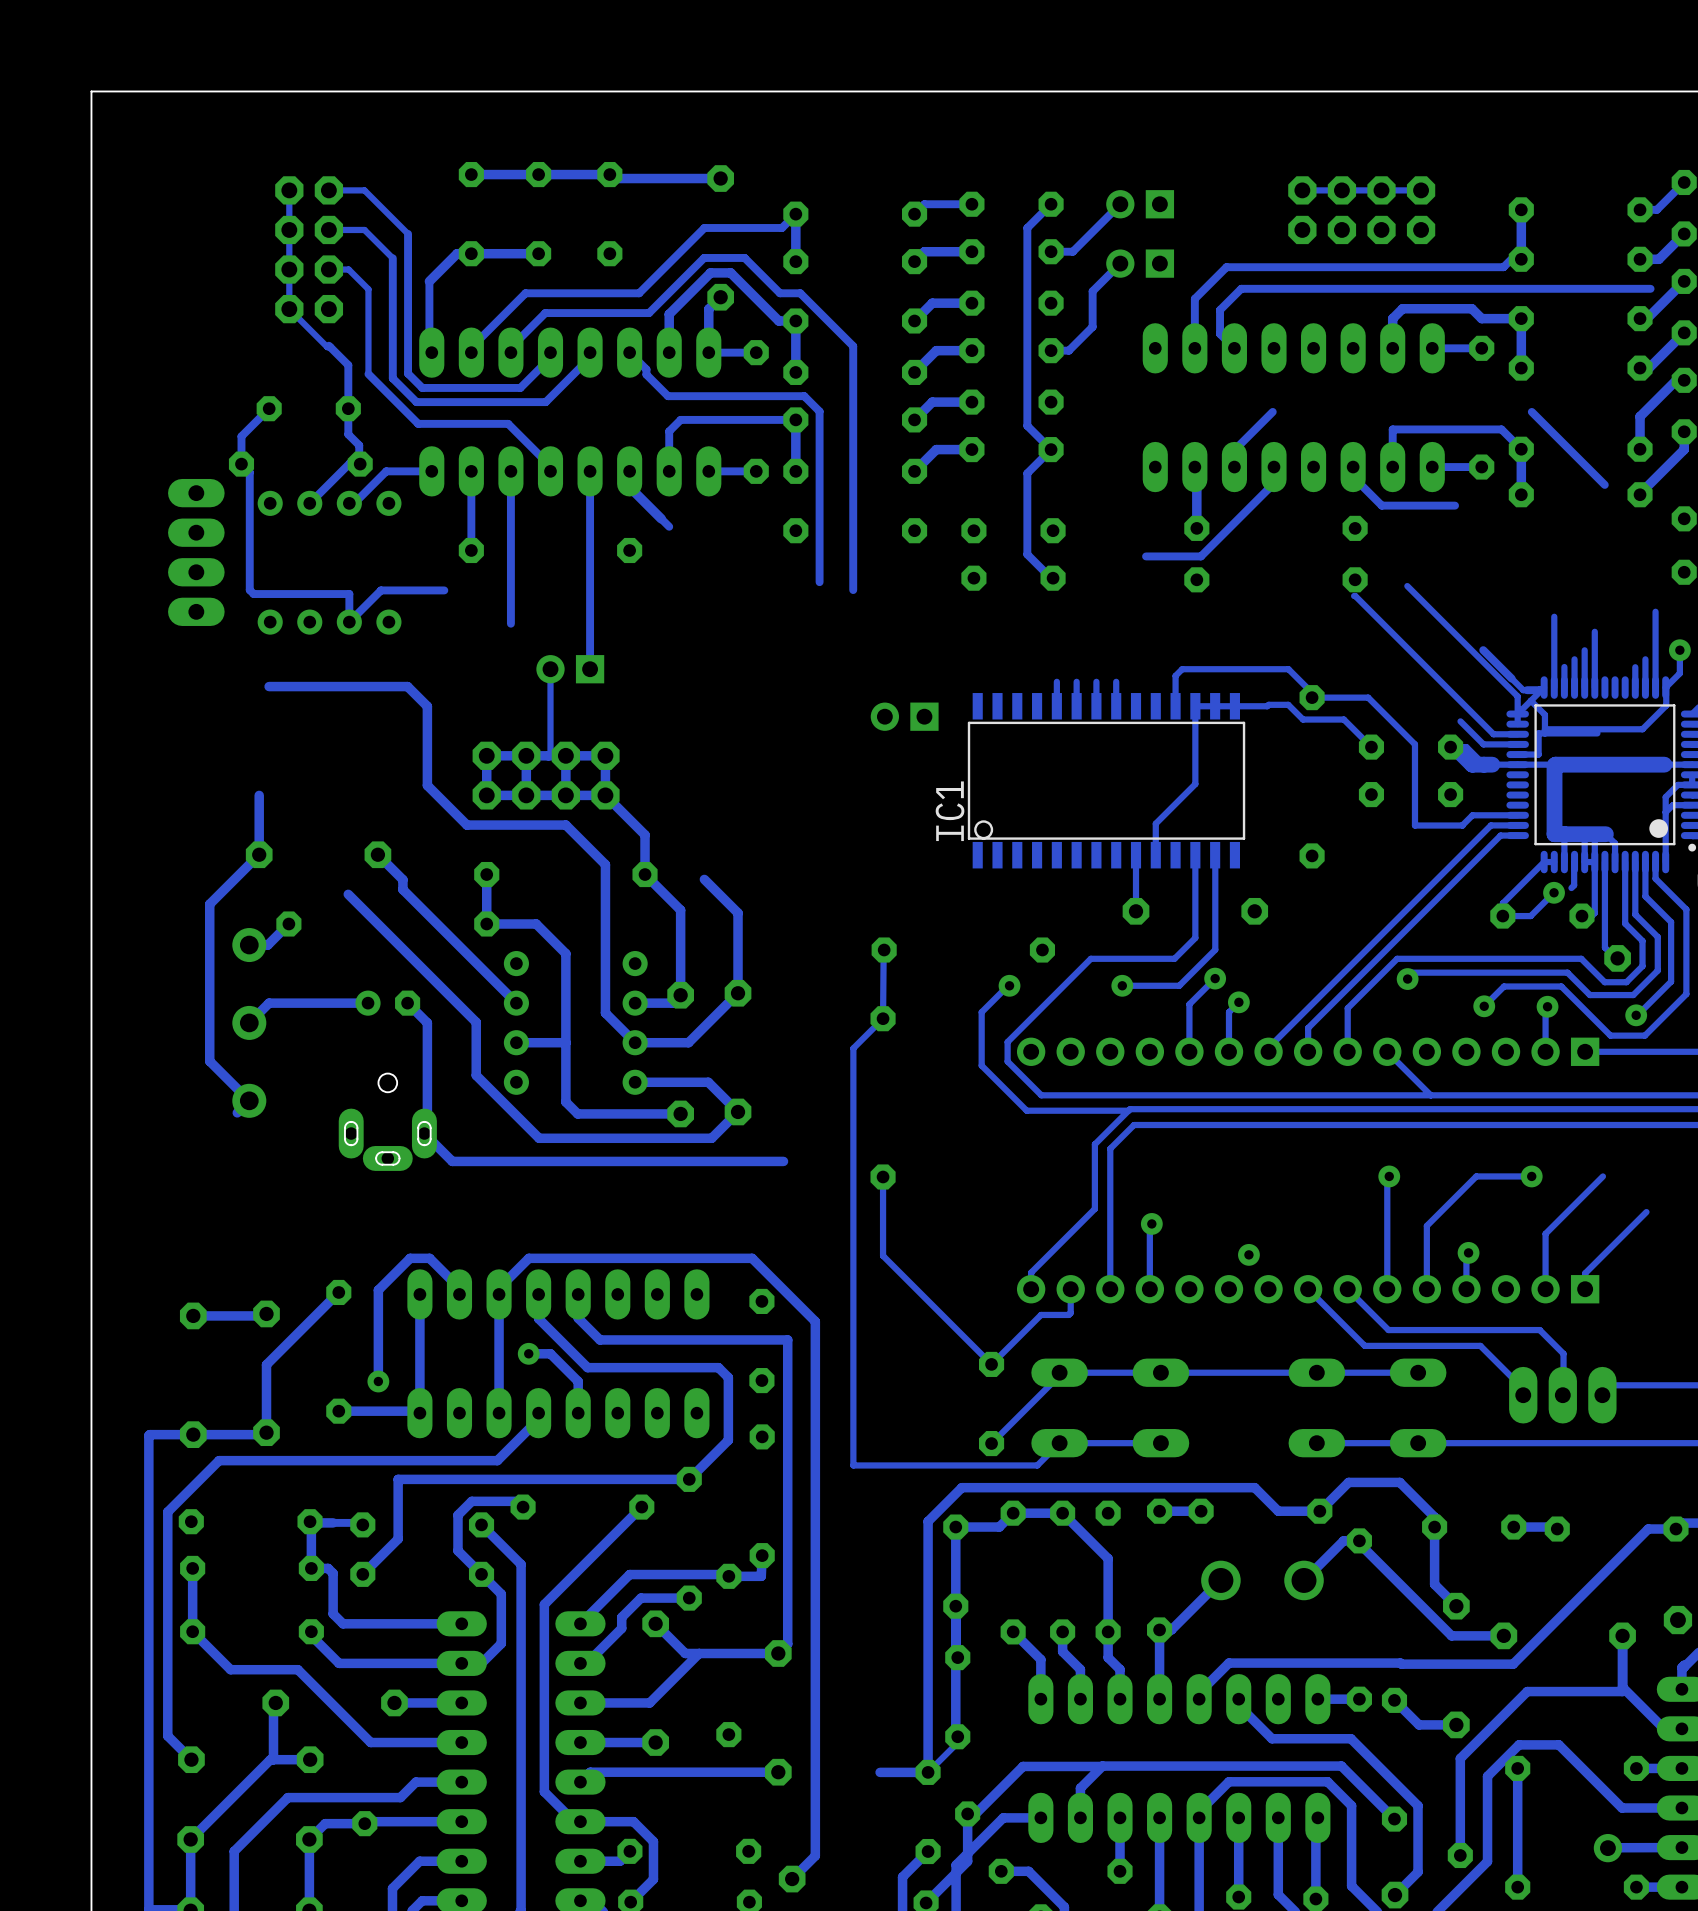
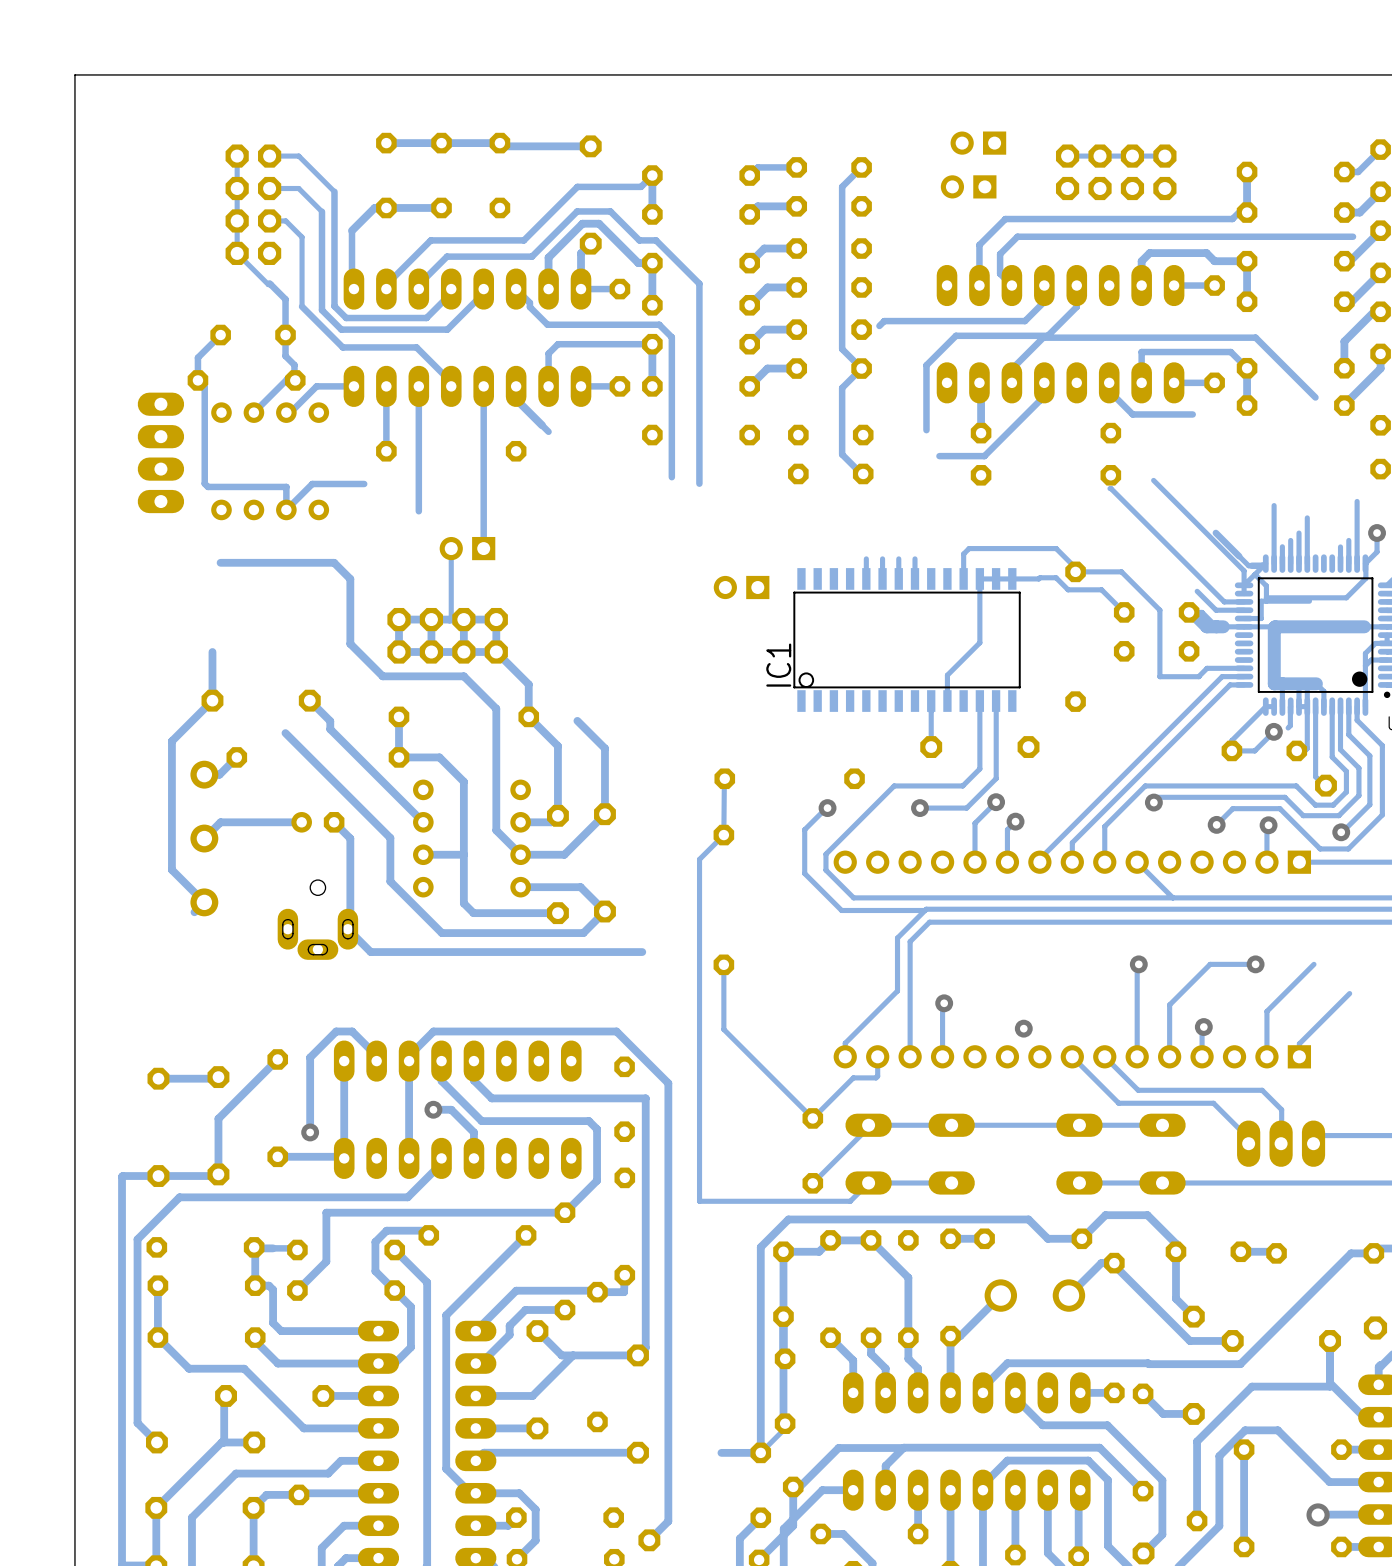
part: none -> (978, 143)
track: (1120, 204) (1072, 251) (1051, 251) -> none
part: (1140, 204) -> none
part: none -> (968, 186)
track: (1120, 263) (1092, 291) (1092, 326) (1068, 350) (1051, 350) -> none
part: (1140, 263) -> none
track: none -> (1044, 285) (1044, 301) (1024, 321) (884, 321) (879, 325)
track: none -> (1076, 285) (1076, 306) (1047, 335) (955, 335) (926, 365) (926, 430)
track: none -> (1255, 337) (1043, 337)

